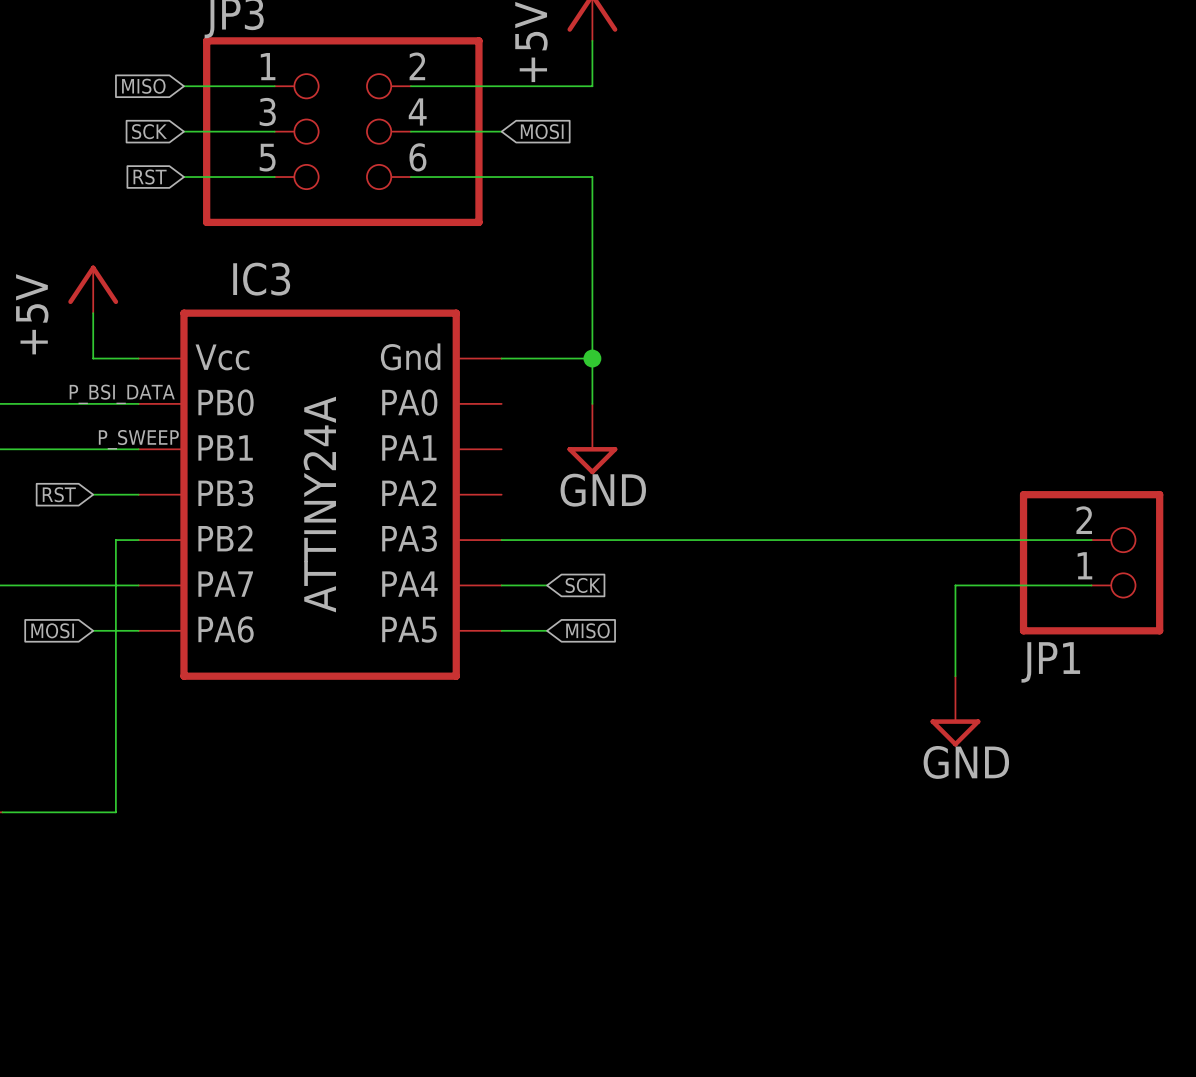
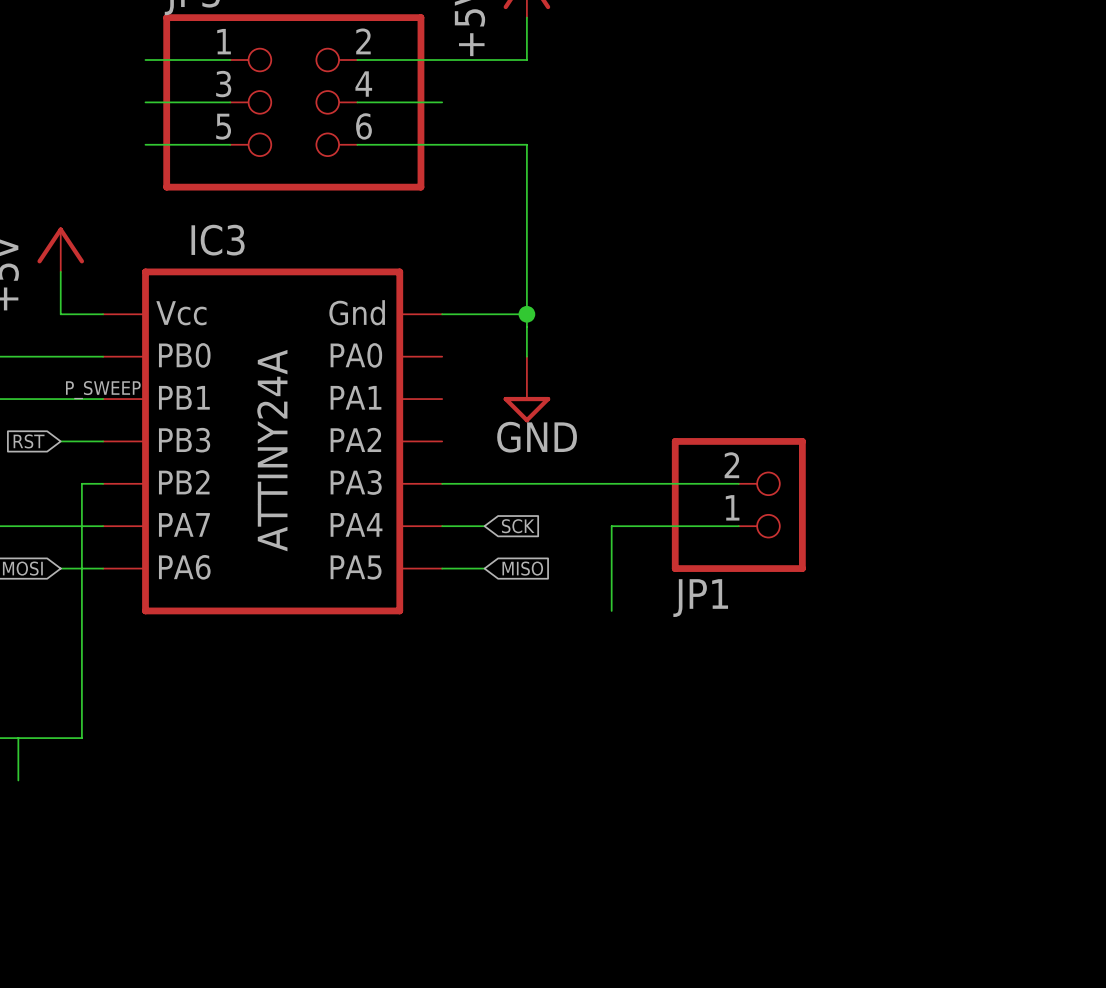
global label: MISO (143, 86) -> none
global label: SCK (149, 131) -> none
global label: MOSI (542, 131) -> none
global label: RST (150, 177) -> none
label: P_BSI_DATA (122, 394) -> none
wire: (819, 540) (1091, 540) -> none
JP1 position: (1091, 562) -> (738, 505)
wire: (1091, 585) (955, 585) (955, 676) -> (738, 526) (611, 526) (611, 610)
power symbol: GND (955, 711) -> none
wire: none -> (18, 738) (18, 780)

